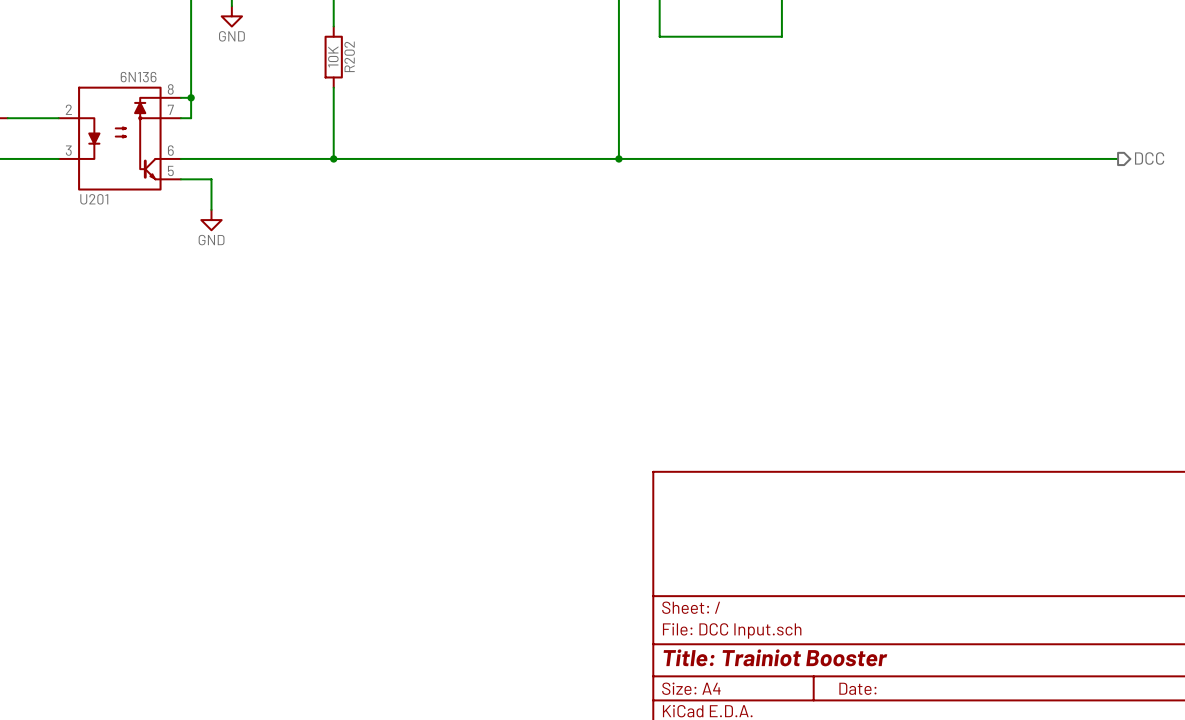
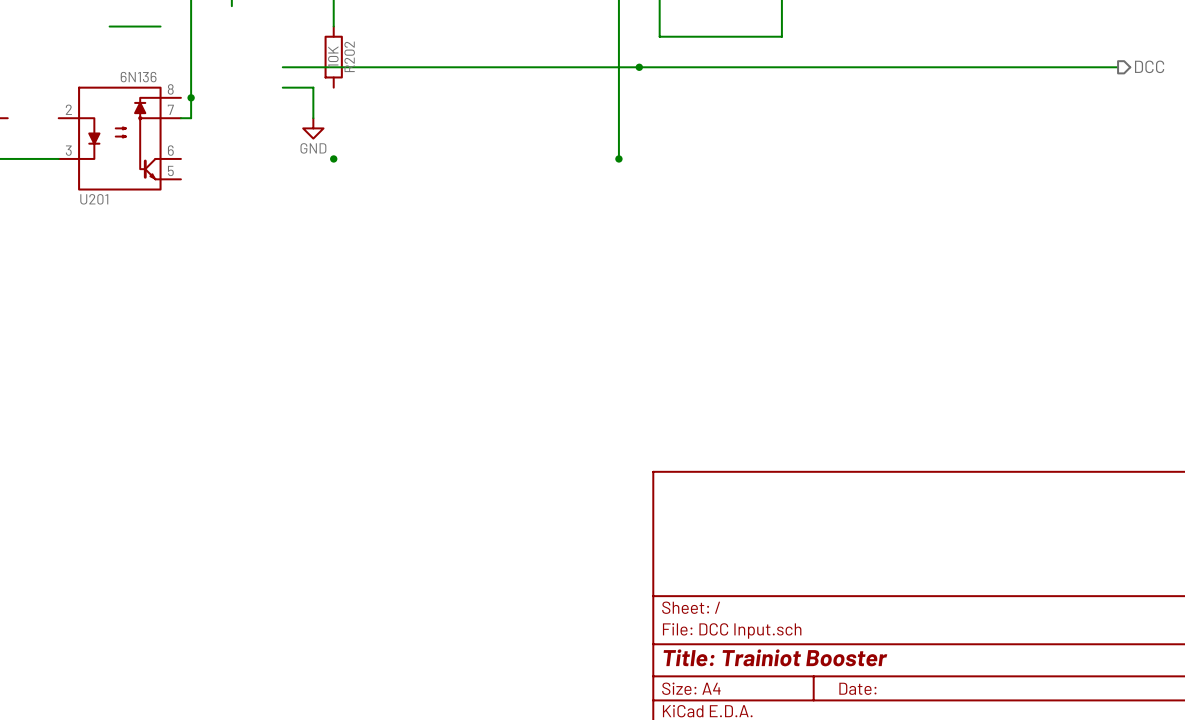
power symbol: GND (231, 16) -> none
wire: none -> (282, 67) (1118, 67)
junction: none -> (639, 67)
wire: (333, 87) (333, 158) -> none
wire: (180, 97) (191, 97) -> none
wire: (7, 118) (58, 118) -> (109, 26) (160, 26)
power symbol: none -> GND (313, 128)
wire: (180, 158) (1118, 158) -> none
hierarchical label position: DCC (1149, 158) -> DCC (1149, 66)
wire: (180, 179) (211, 179) (211, 209) -> (282, 87) (313, 87) (313, 118)
power symbol: GND (211, 220) -> none

